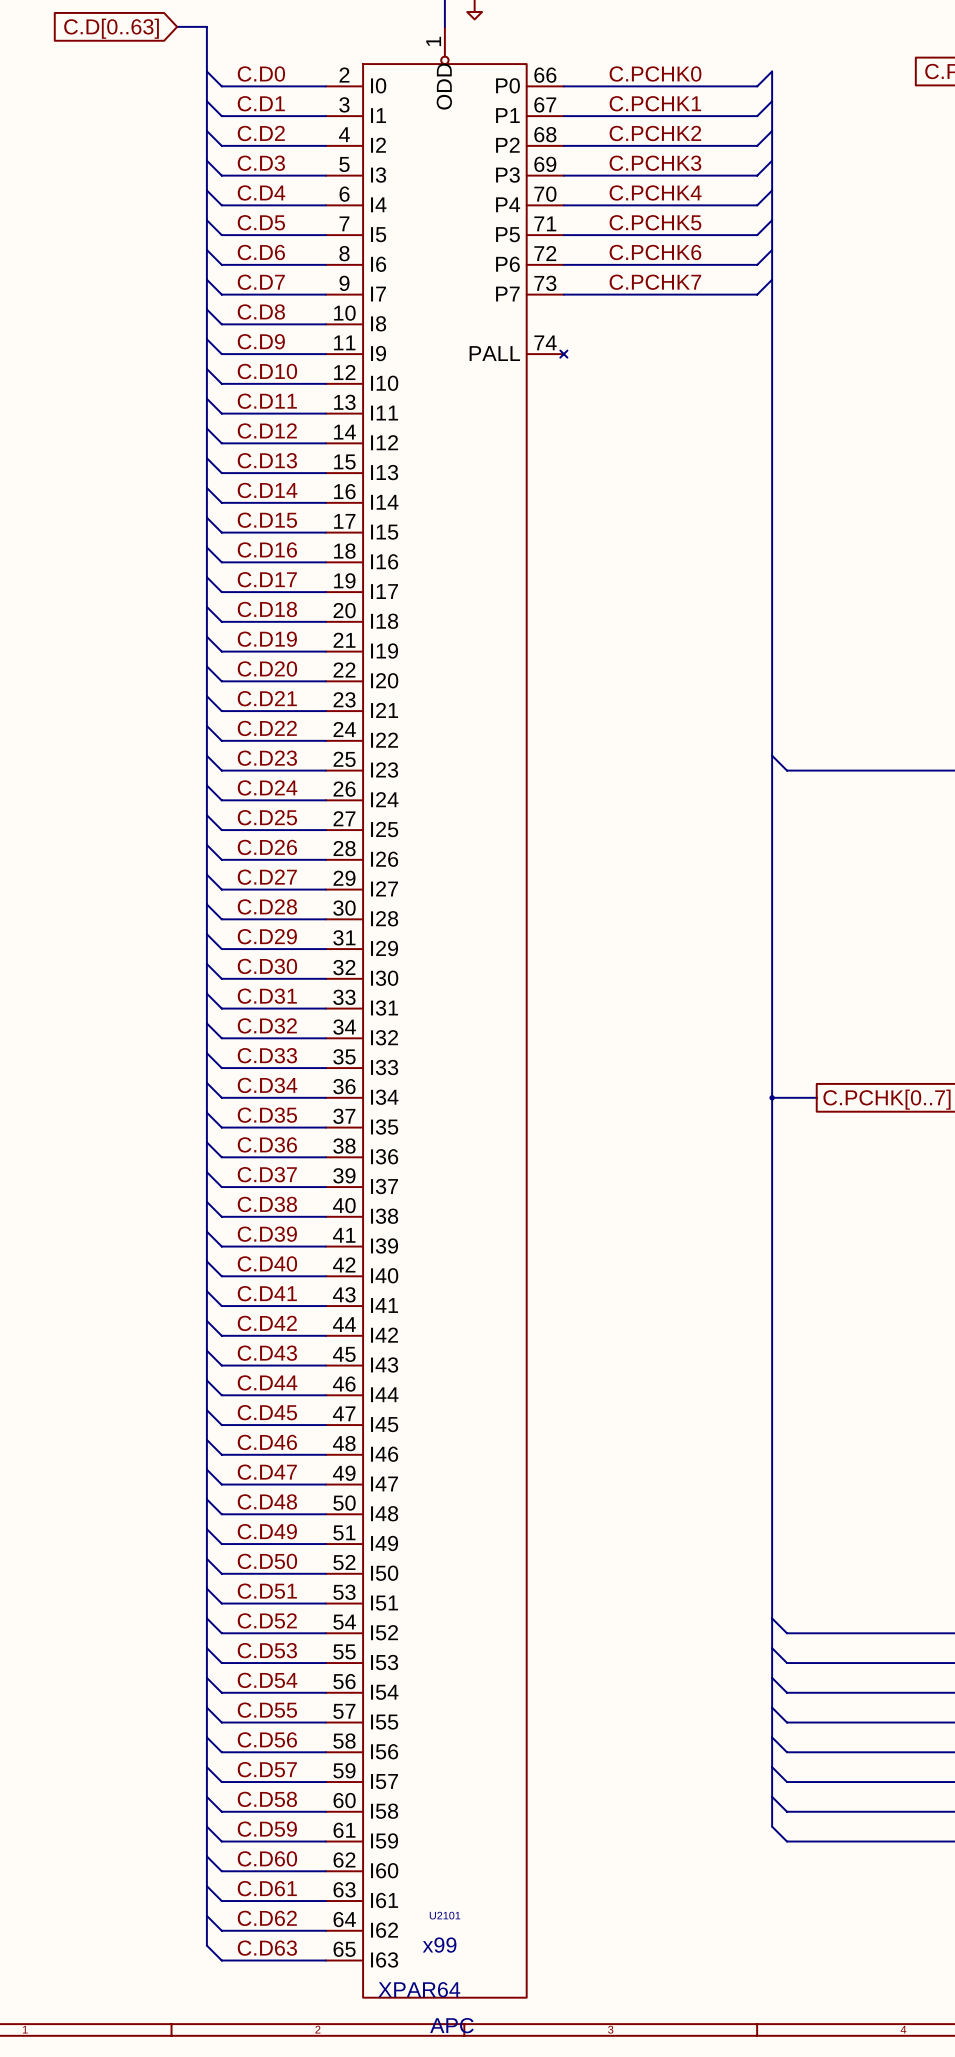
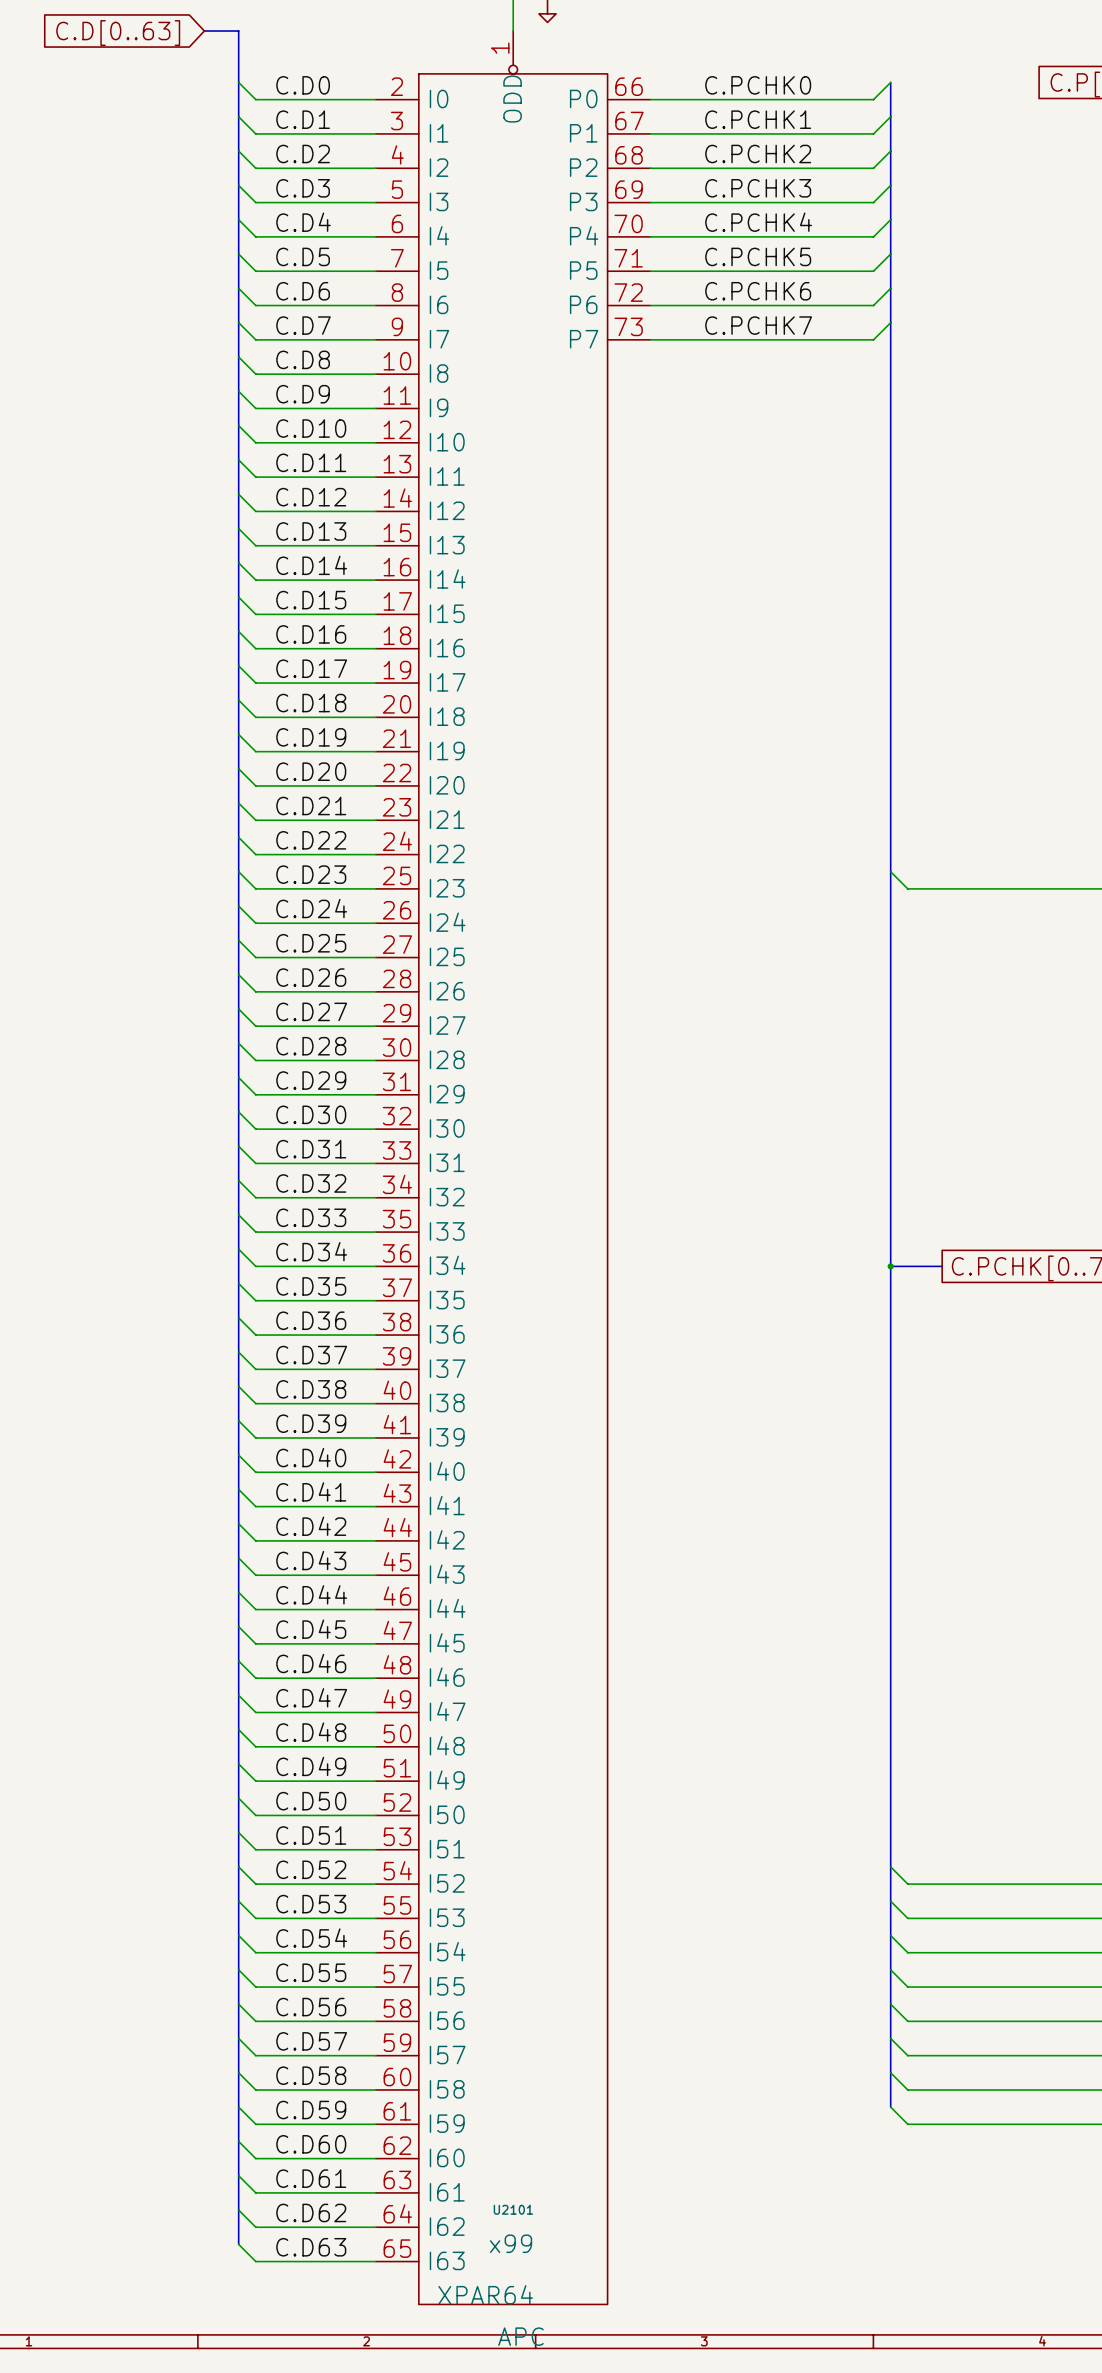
U2101 symbol: [325, 26, 564, 1998] -> [375, 31, 651, 2305]
no-connect mark: (563, 354) -> none

